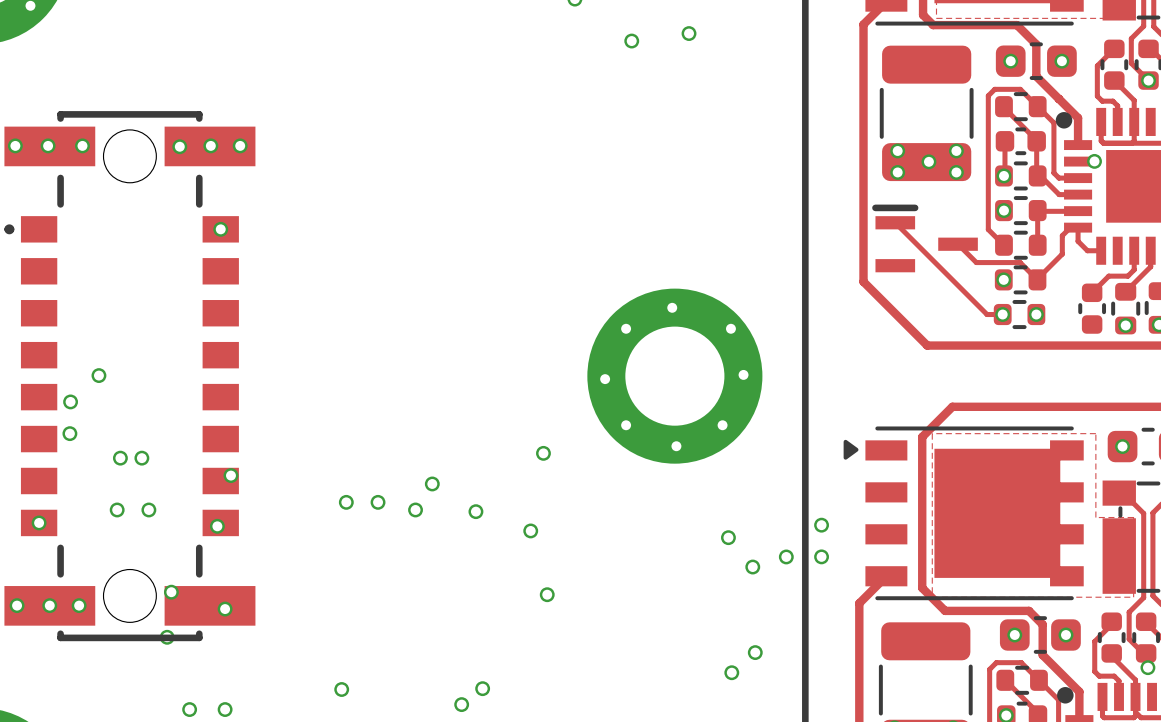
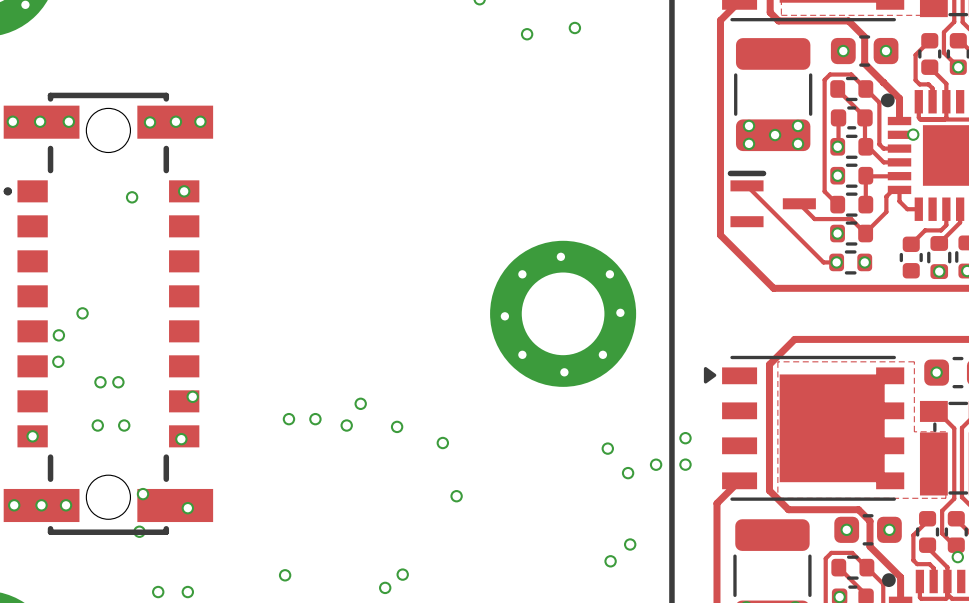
via: none -> (132, 197)
via: (543, 453) -> none

